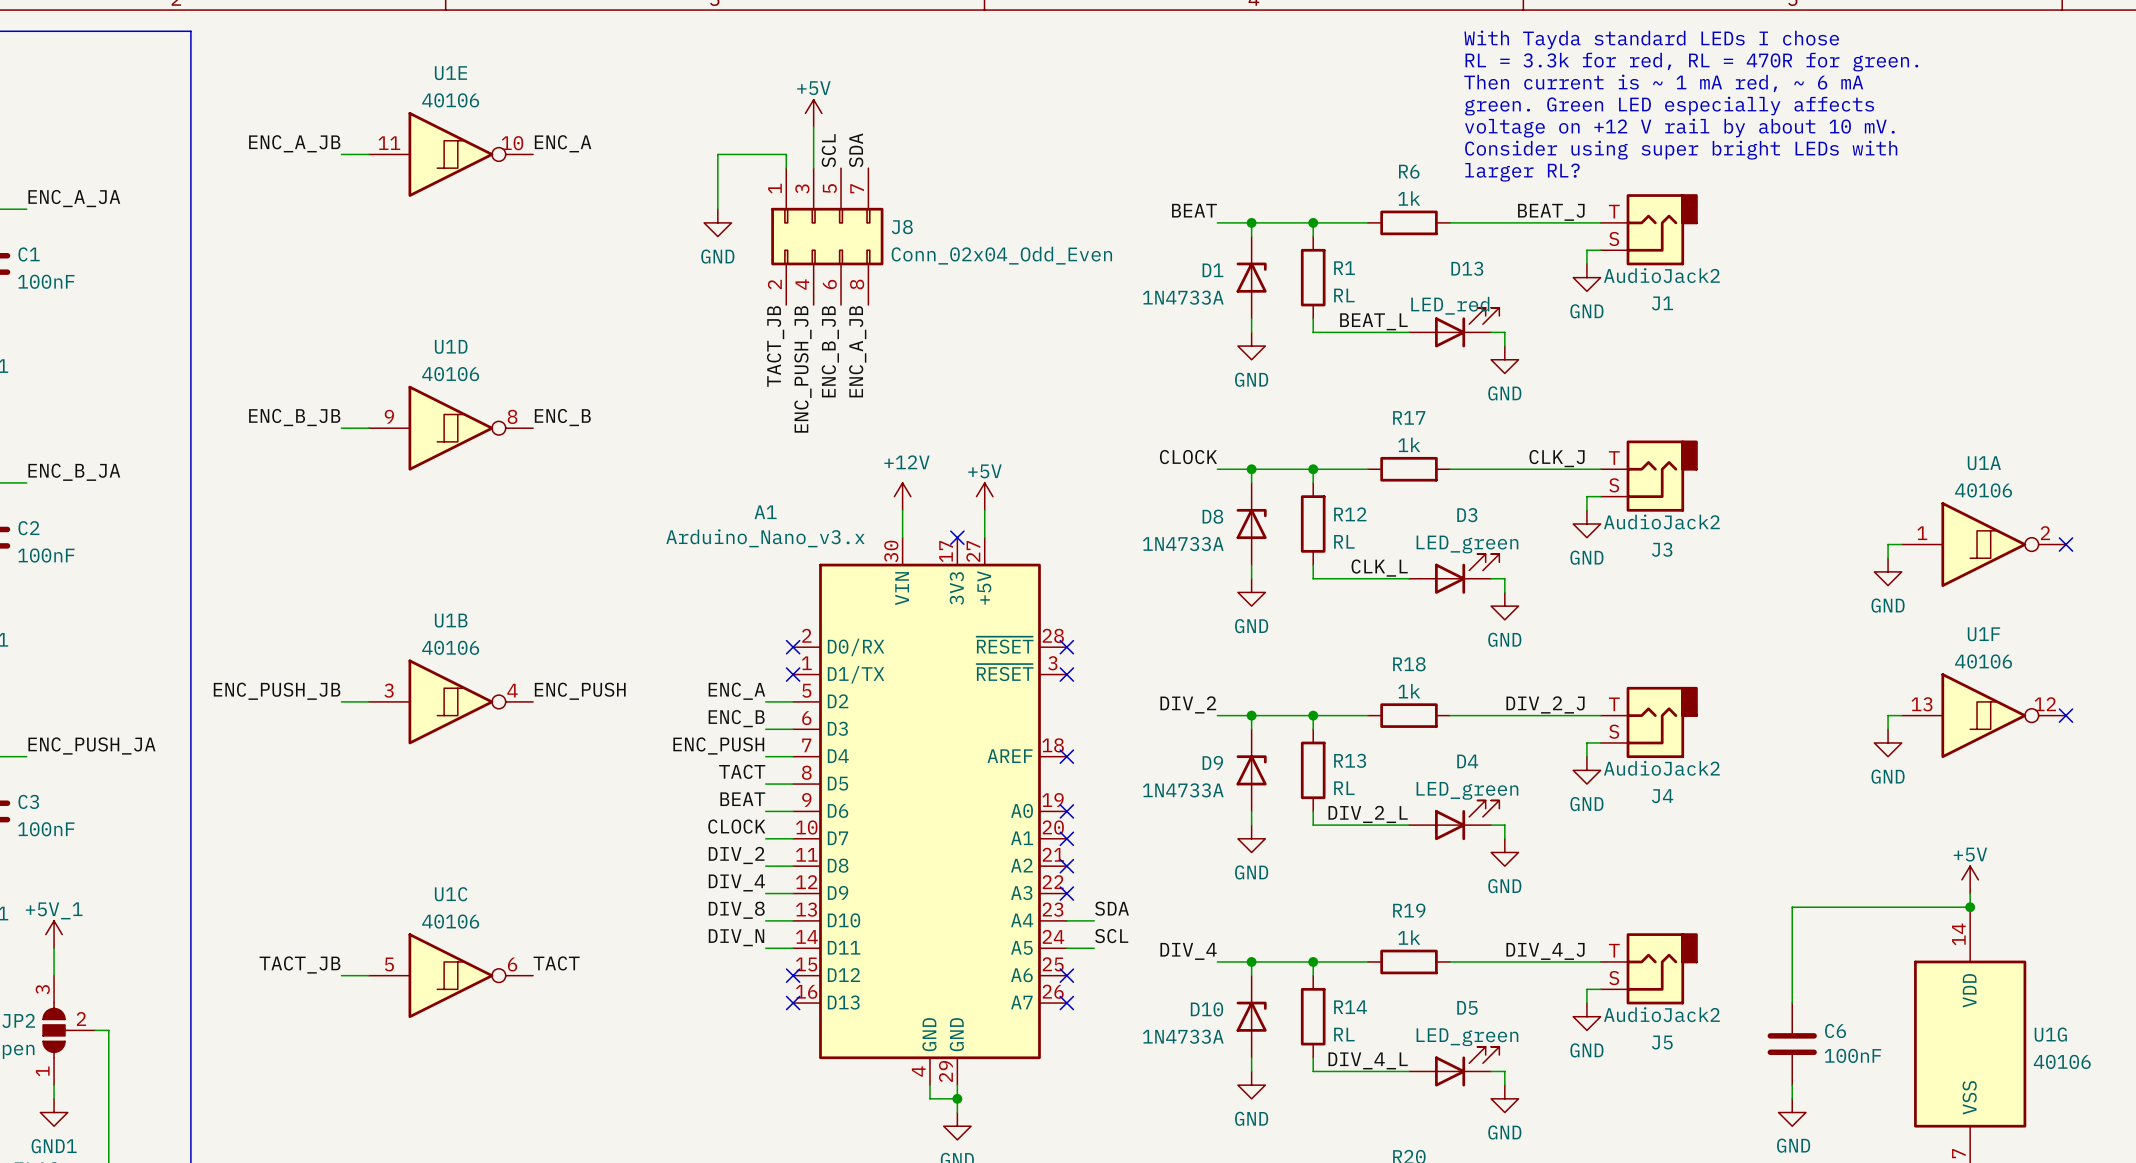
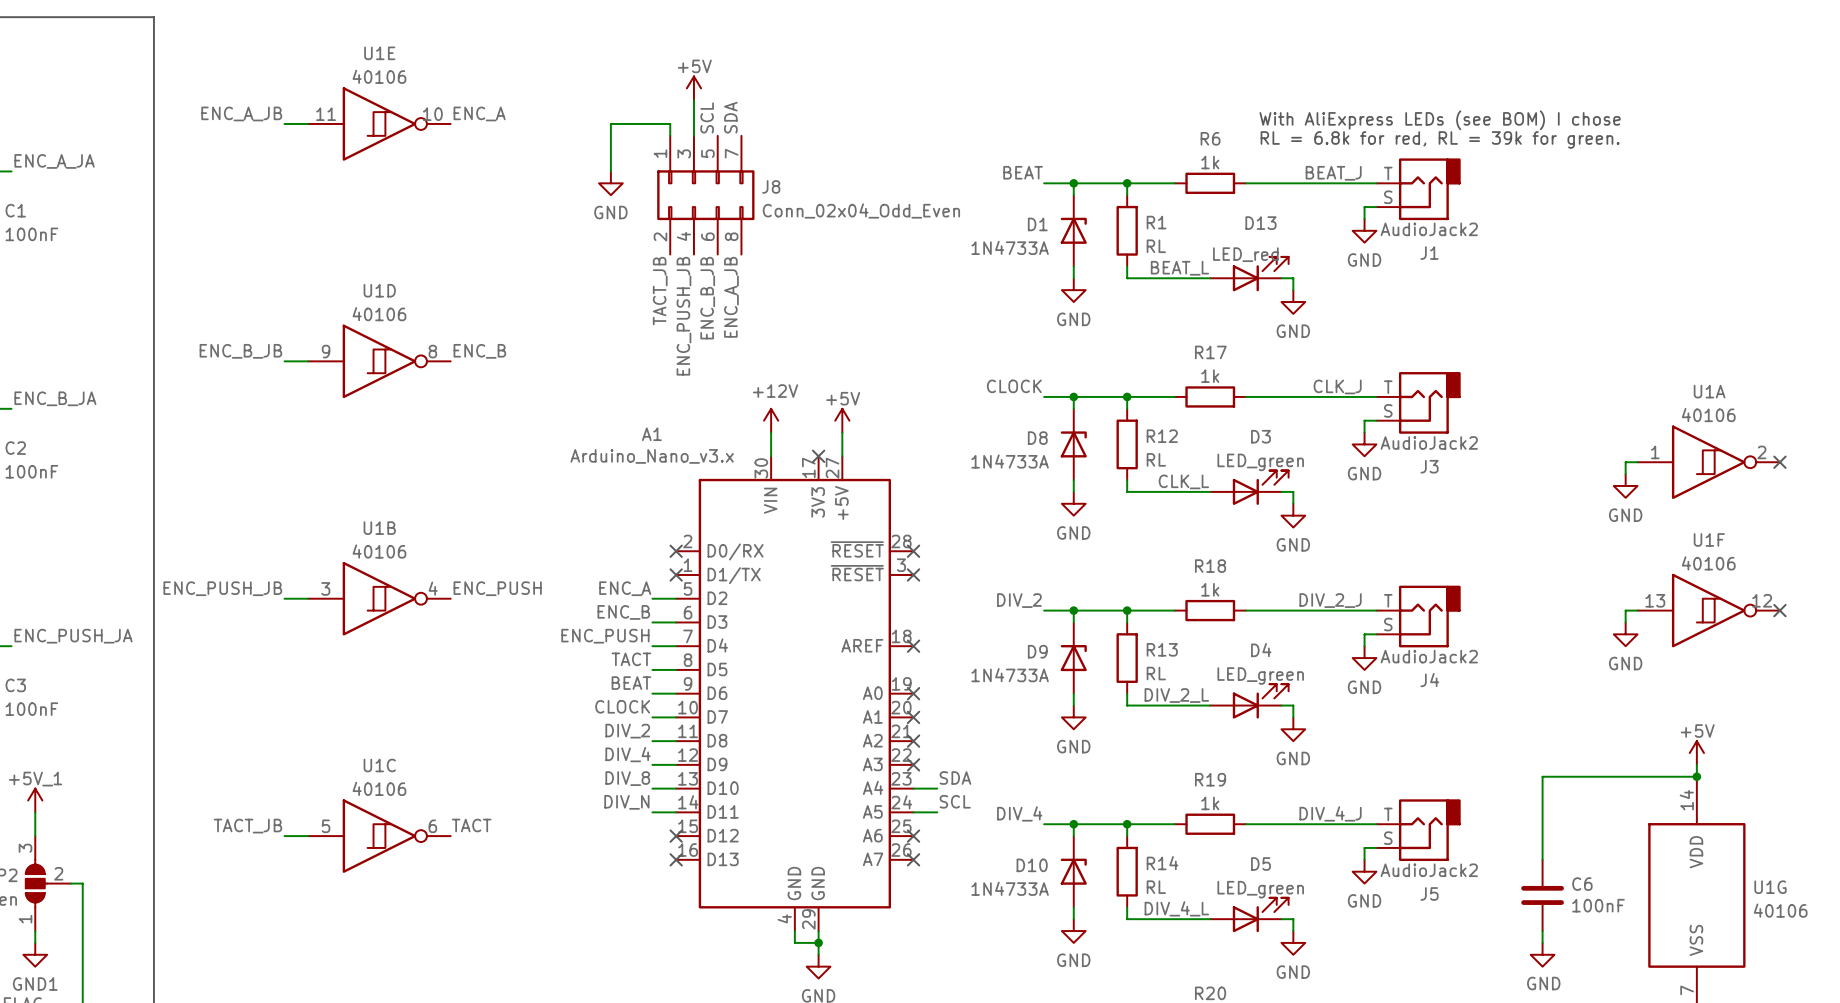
text: With Tayda standard LEDs I chose (1651, 39) -> none
text: RL = 3.3k for red, RL = 470R for green. (1691, 62) -> none
text: Then current is ~ 1 mA red, ~ 6 mA (1663, 83) -> none
text: green. Green LED especially affects (1669, 106) -> none
text: voltage on +12 V rail by about 10 mV. (1679, 128) -> none
text: Consider using super bright LEDs with (1681, 150) -> With AliExpress LEDs (see BOM) I chose (1440, 120)
text: larger RL? (1522, 172) -> RL = 6.8k for red, RL = 39k for green. (1440, 139)

